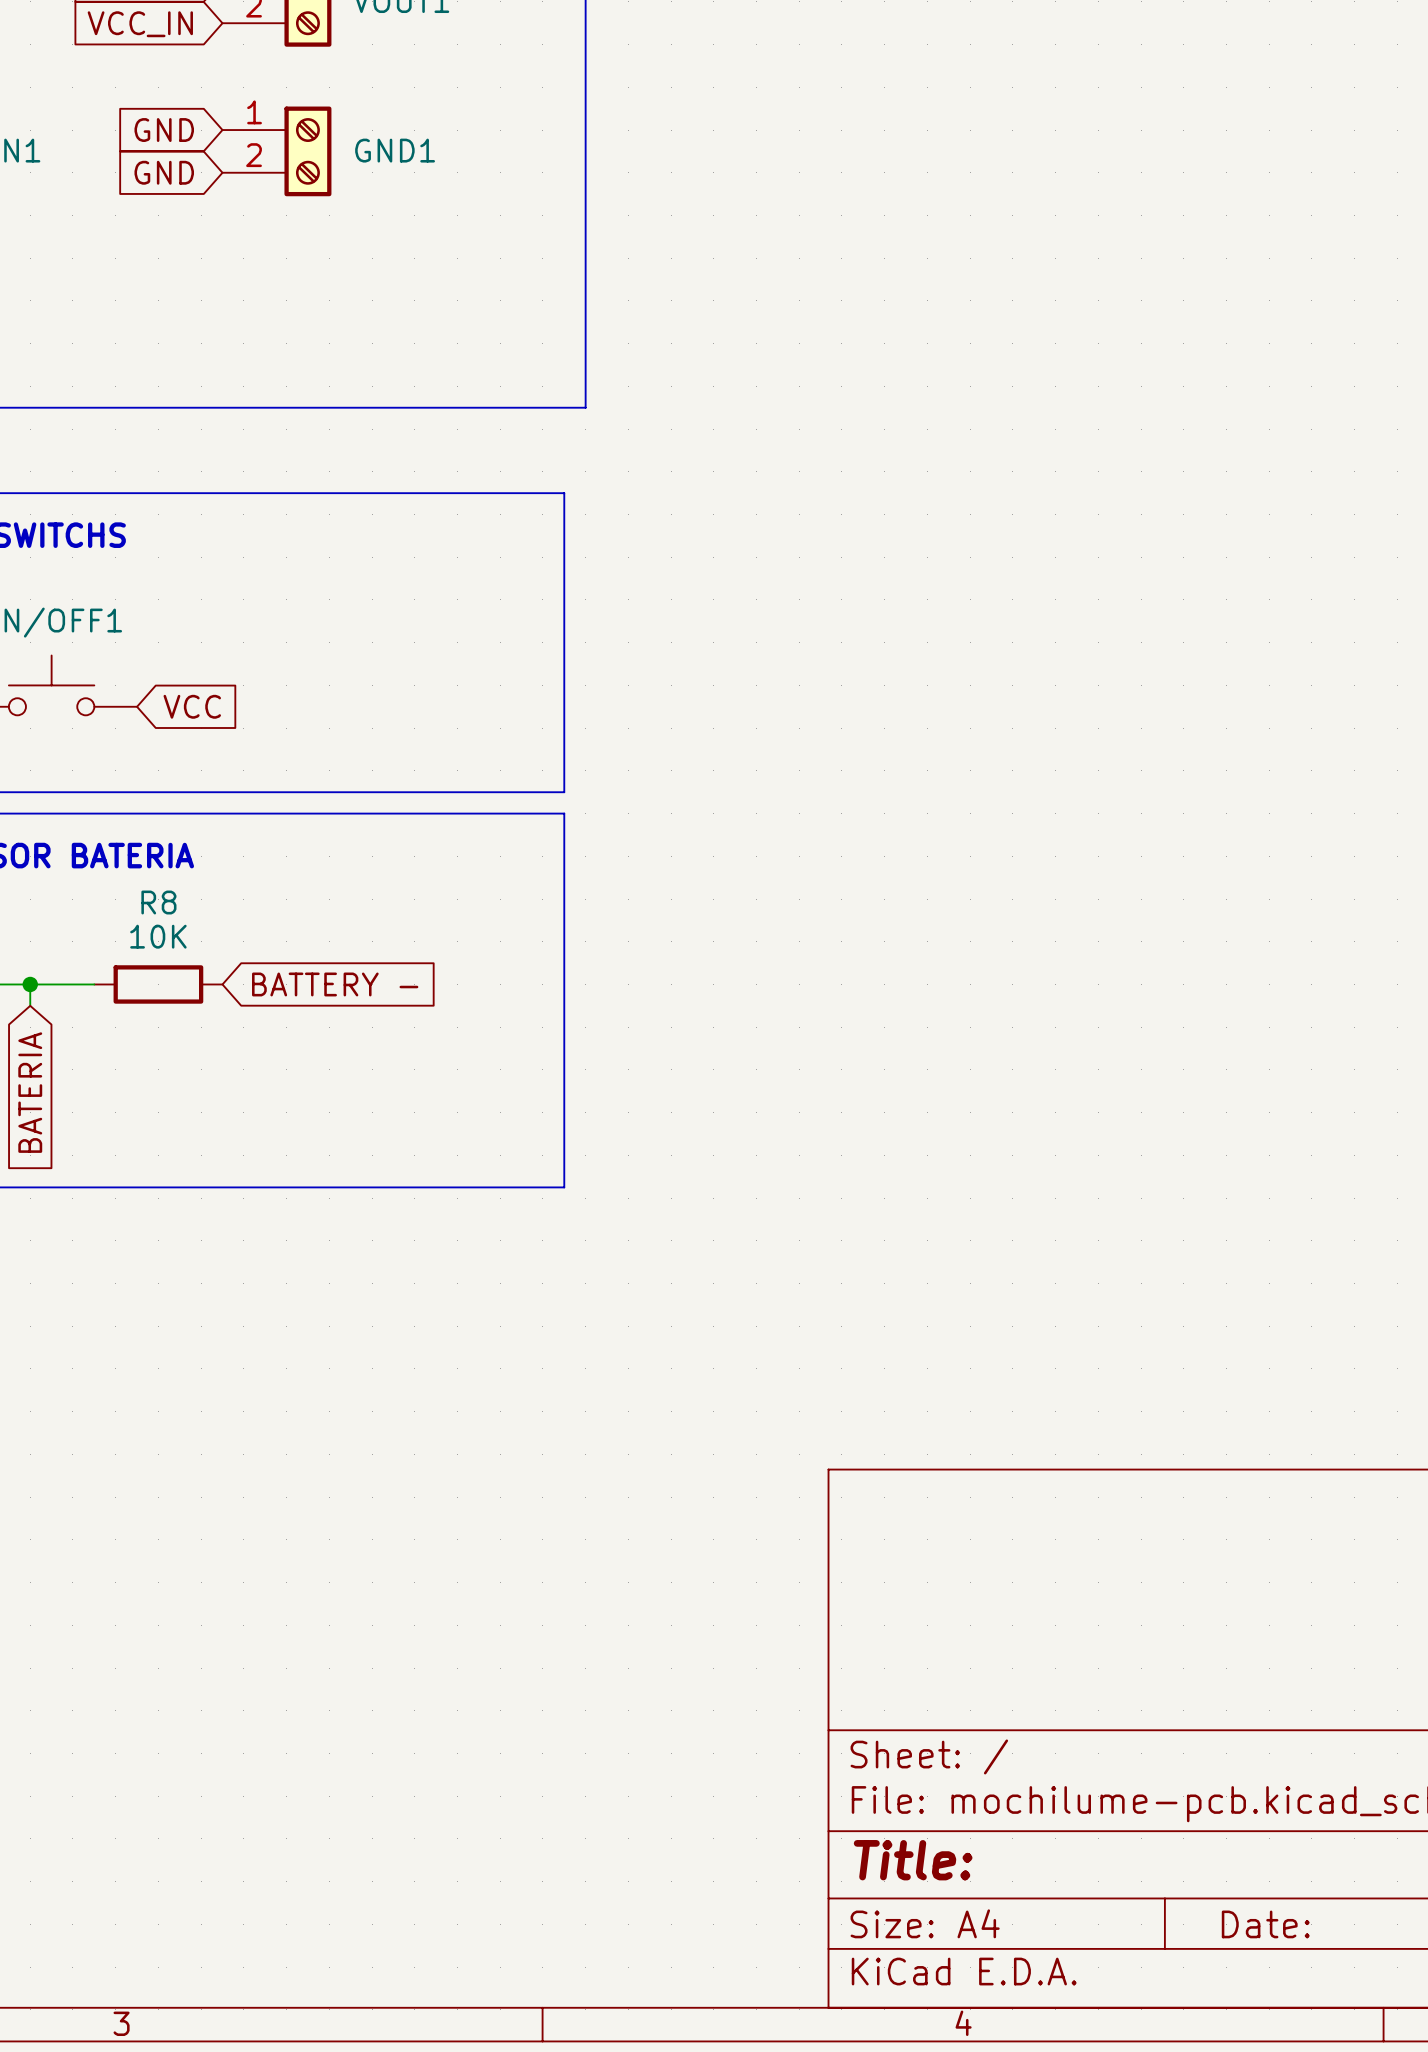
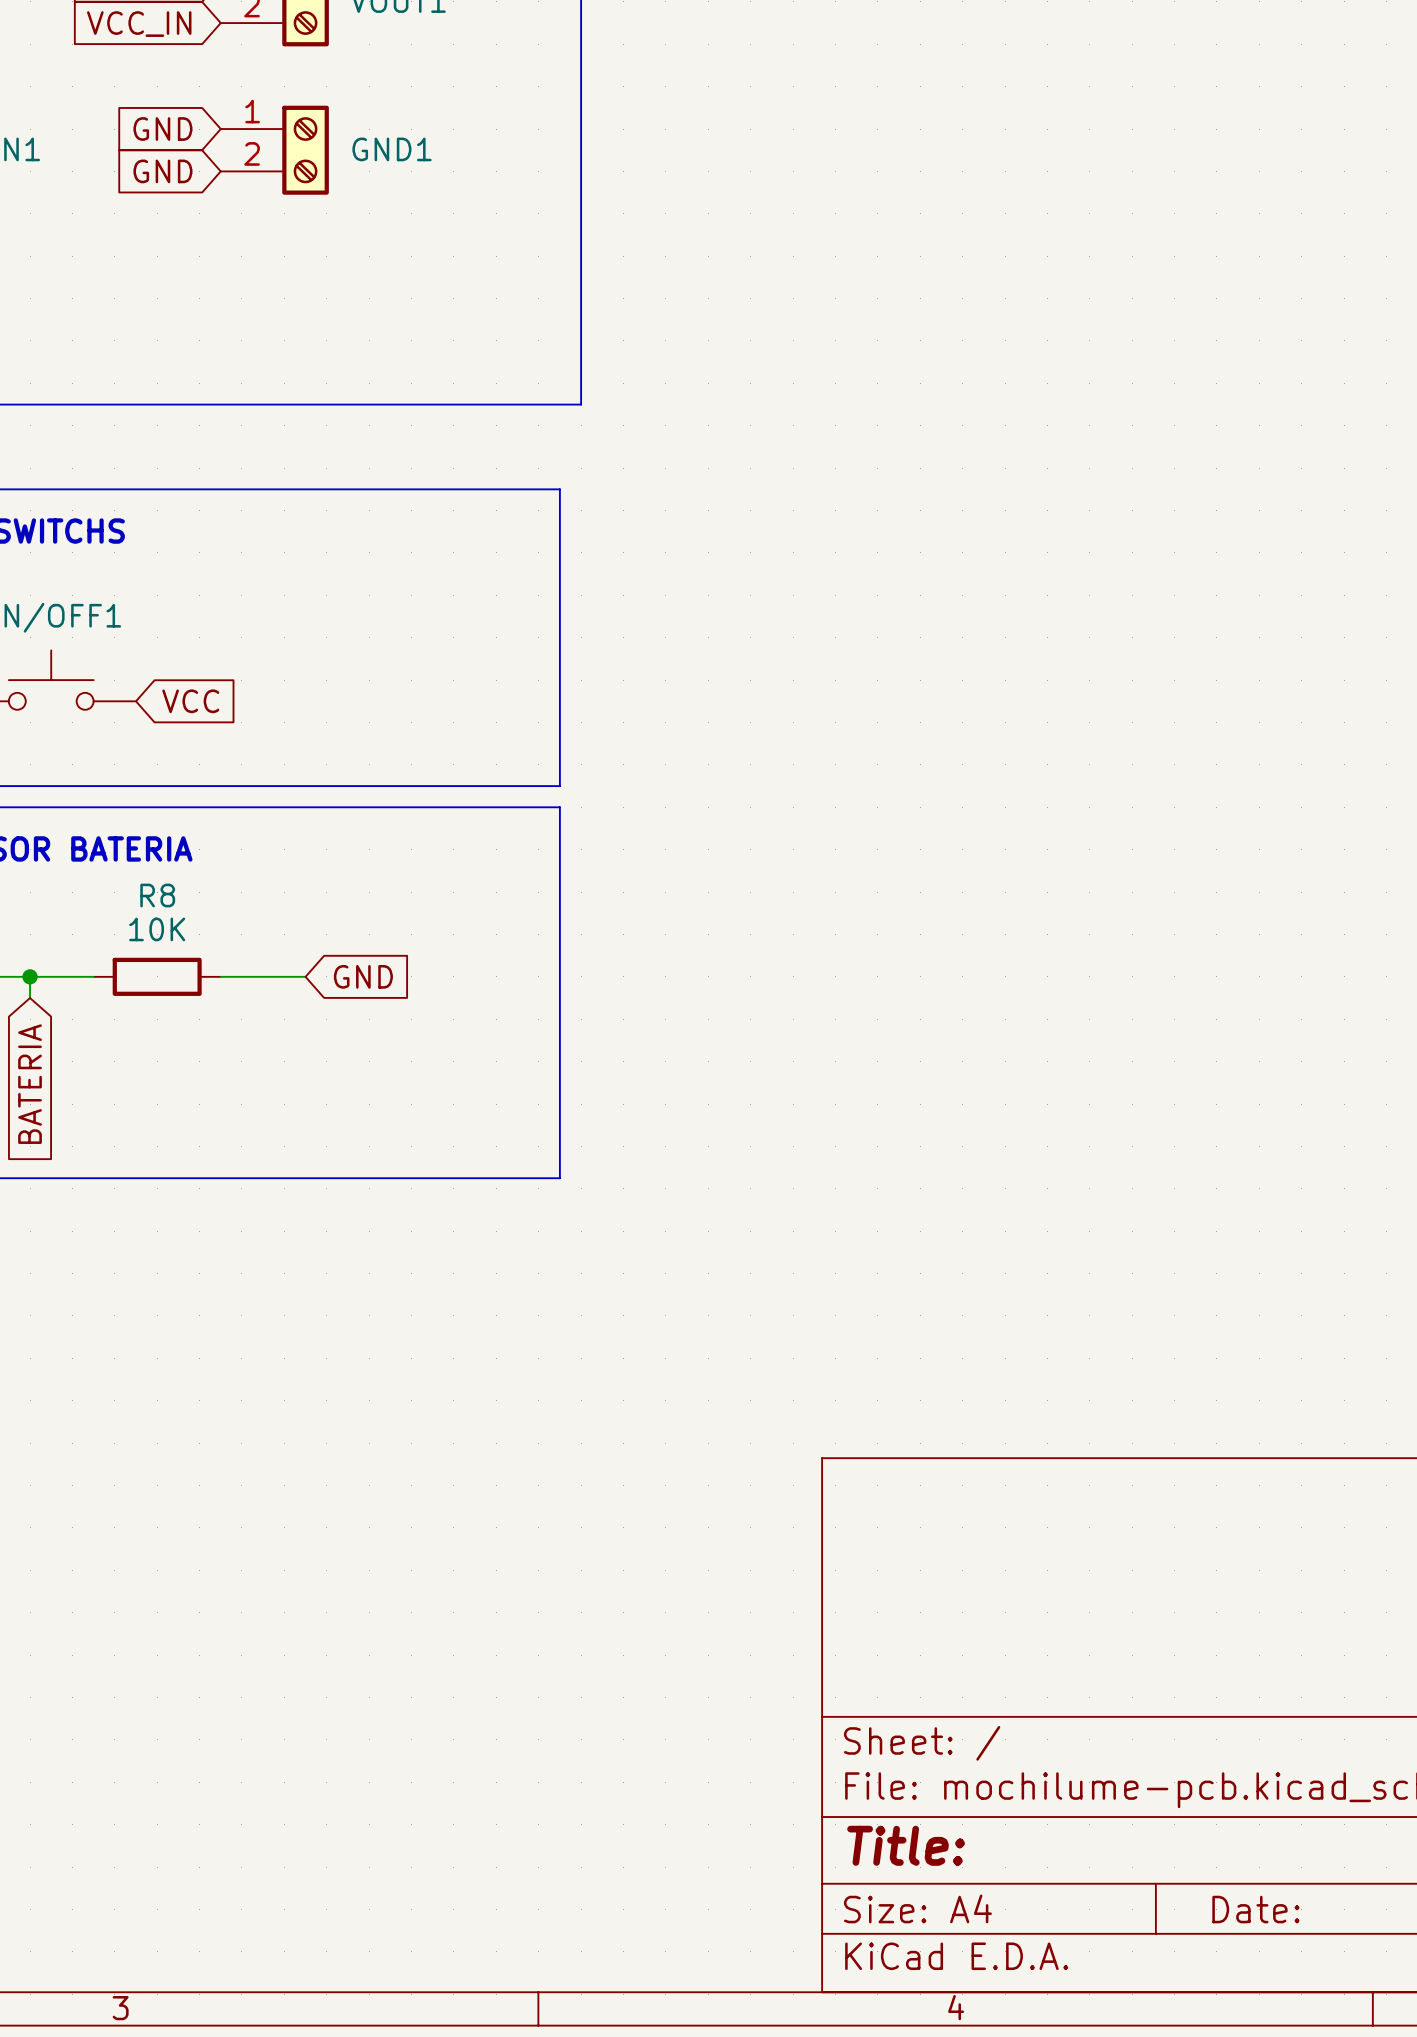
wire: none -> (220, 976) (305, 976)
global label: BATTERY - (335, 984) -> none
global label: none -> GND (363, 976)

